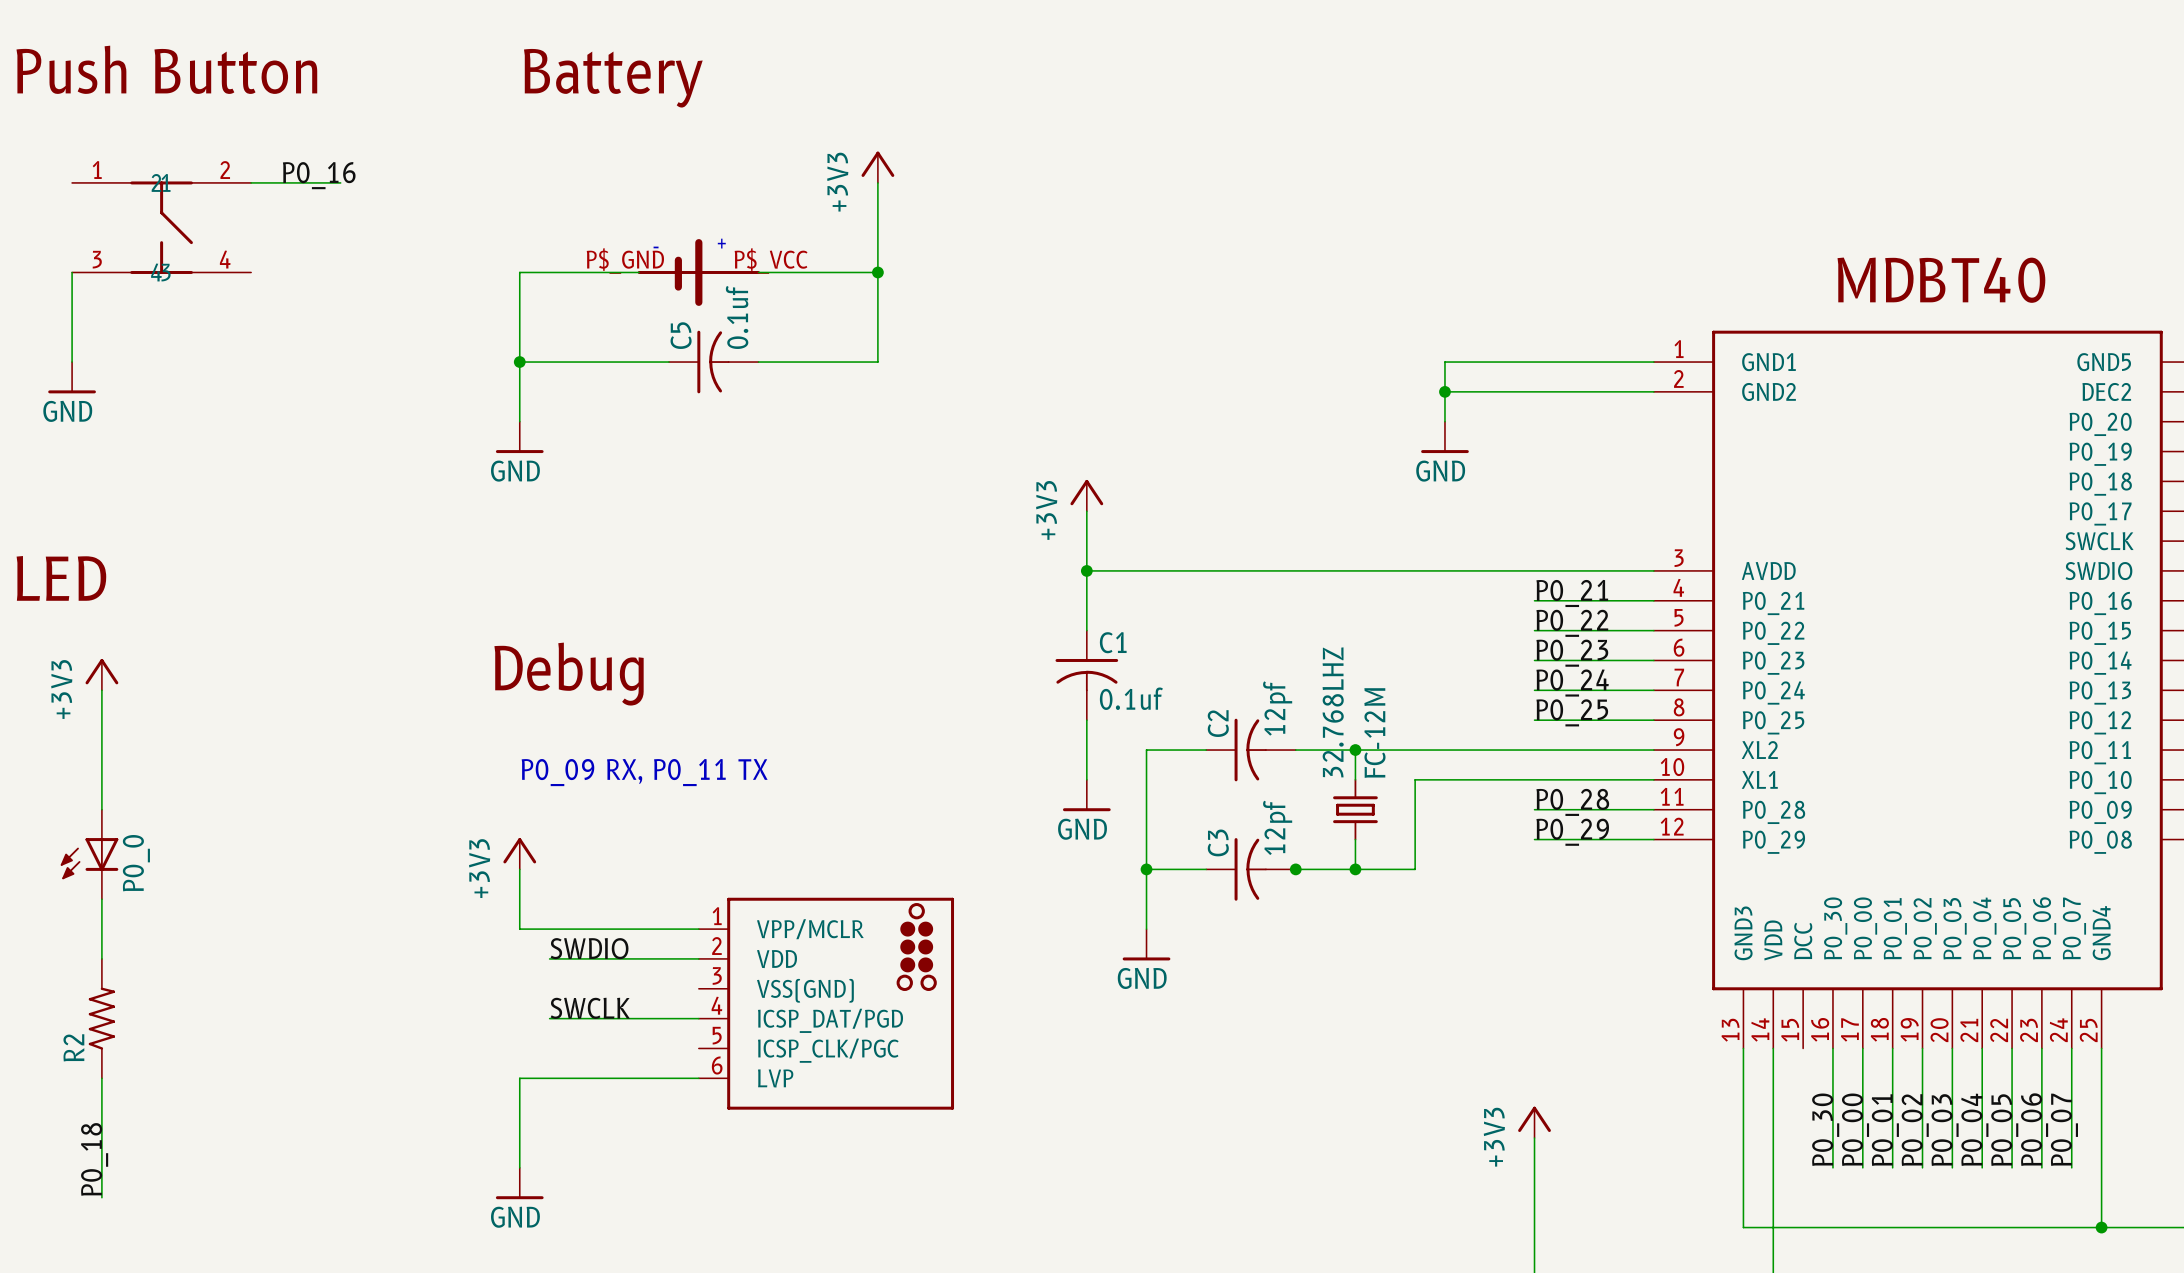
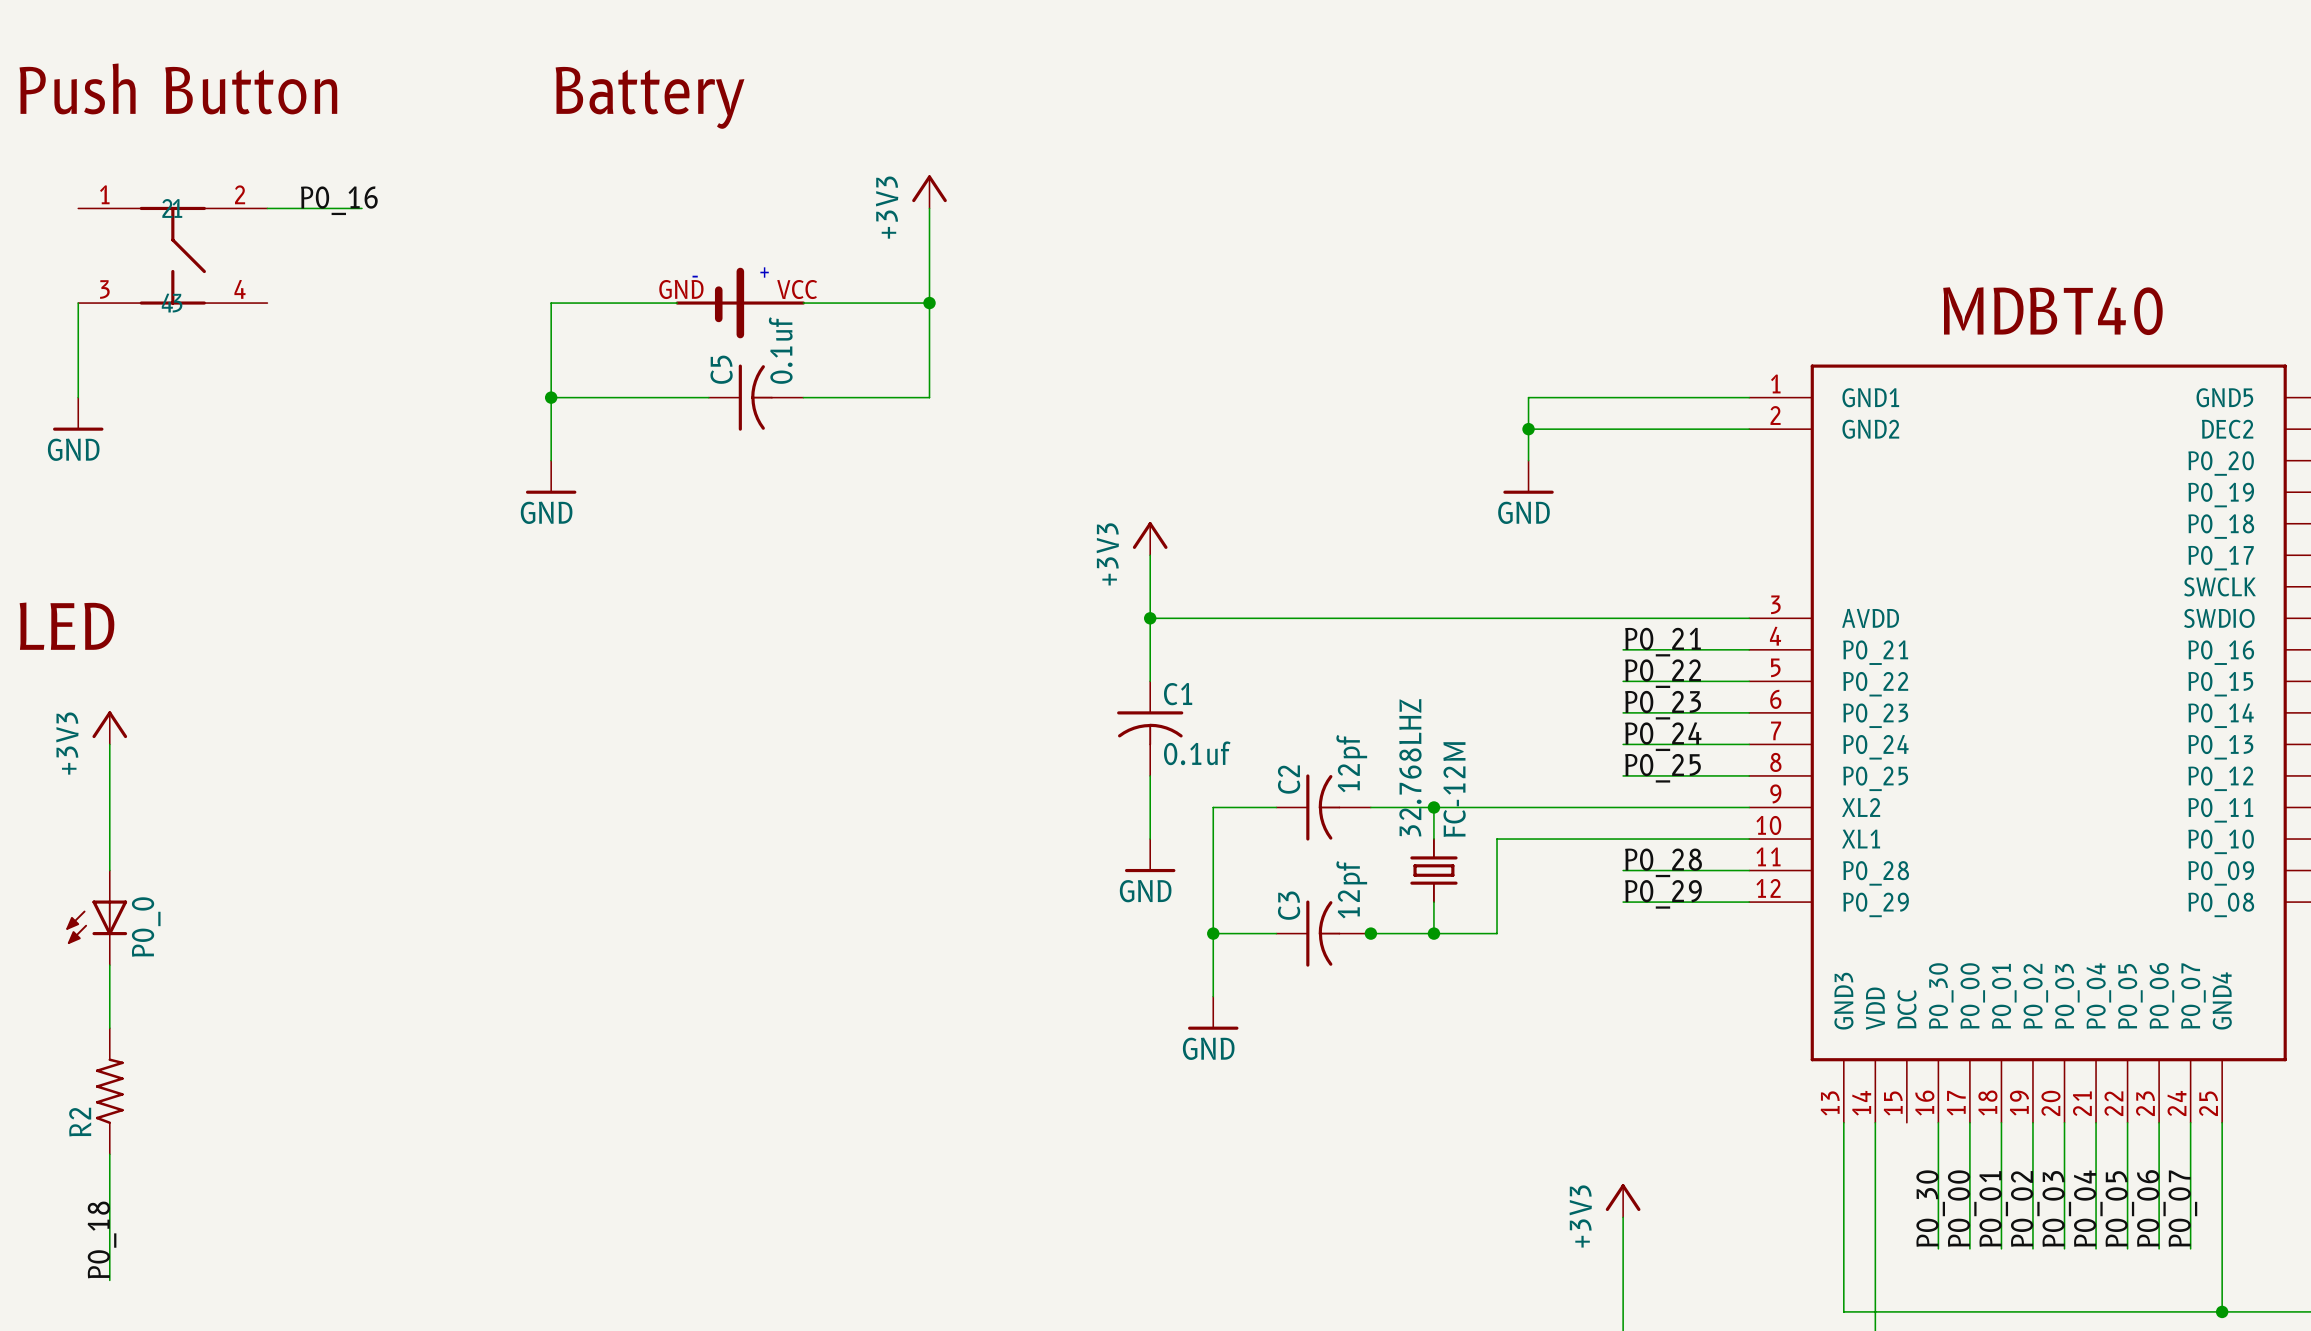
part pin number: P$_GND (625, 261) -> GND (681, 289)
part pin number: P$_VCC (771, 261) -> VCC (797, 289)
text: Debug (569, 674) -> none
text: P0_09 RX, P0_11 TX (644, 772) -> none
power symbol: +3V3 (519, 853) -> none
wire: (519, 869) (519, 929) (698, 929) -> none
label: SWDIO (589, 948) -> none
wire: (549, 958) (698, 958) -> none
part: (826, 1003) -> none
label: SWCLK (590, 1008) -> none
wire: (549, 1018) (698, 1018) -> none
wire: (698, 1078) (519, 1078) (519, 1167) -> none
power symbol: GND (519, 1183) -> none

